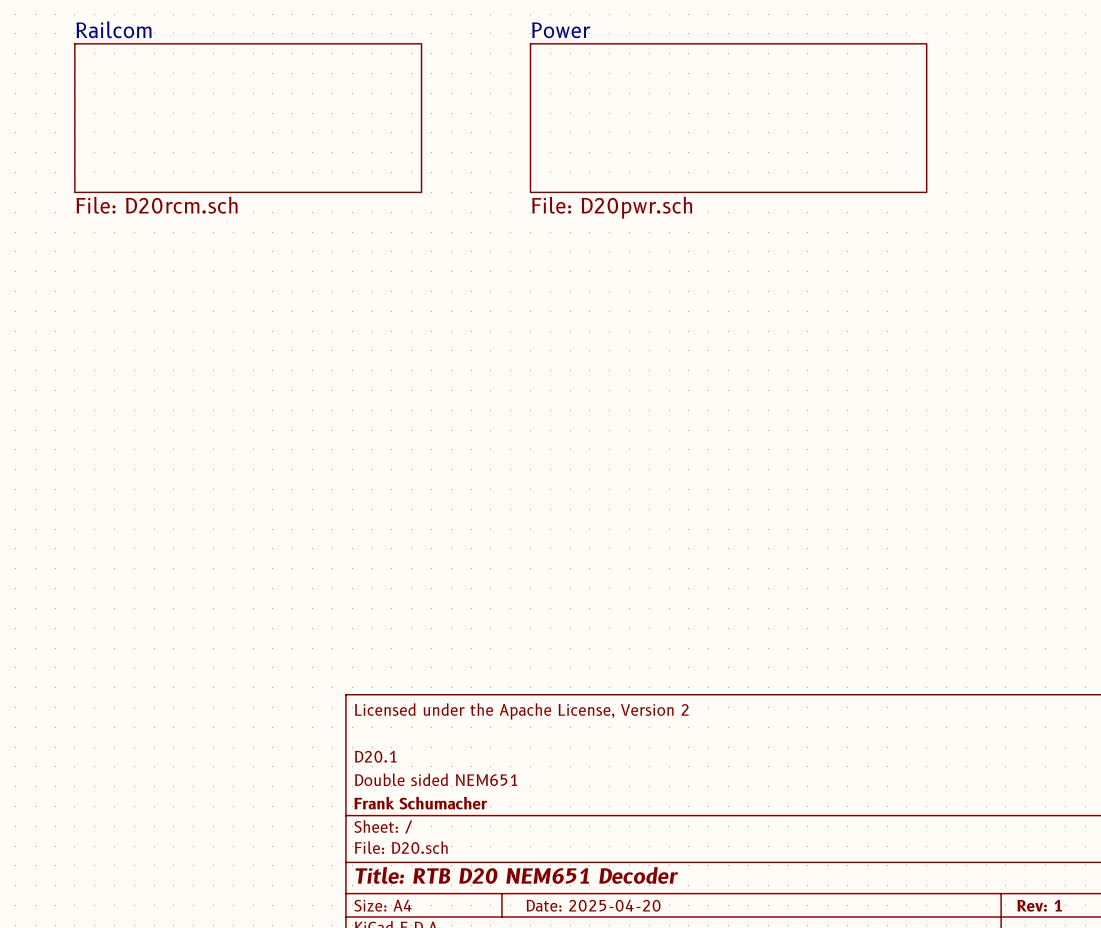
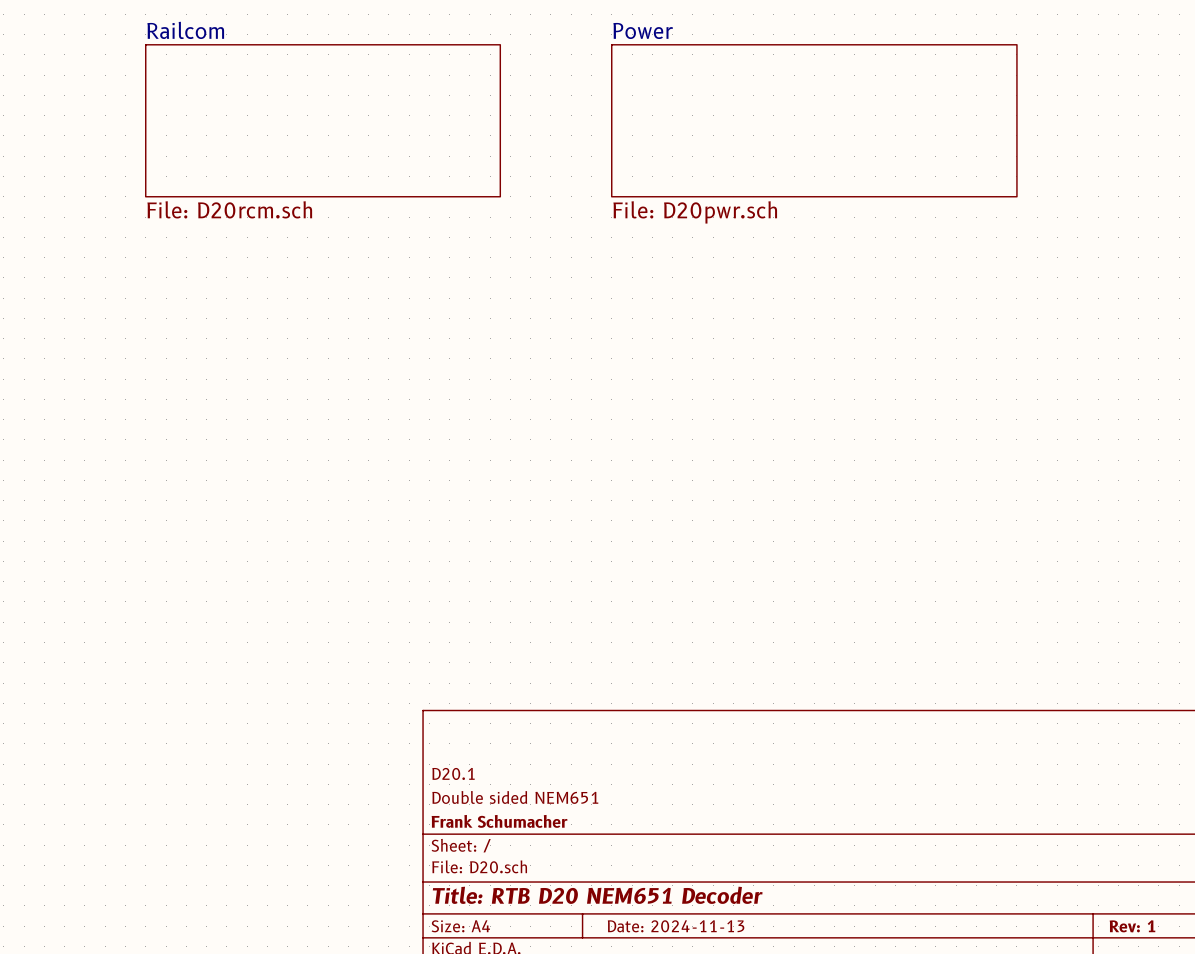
title block: Licensed under the Apache License, Version 2 (521, 711) -> none
title block: Date: 2025-04-20 (593, 905) -> Date: 2024-11-13 (676, 926)

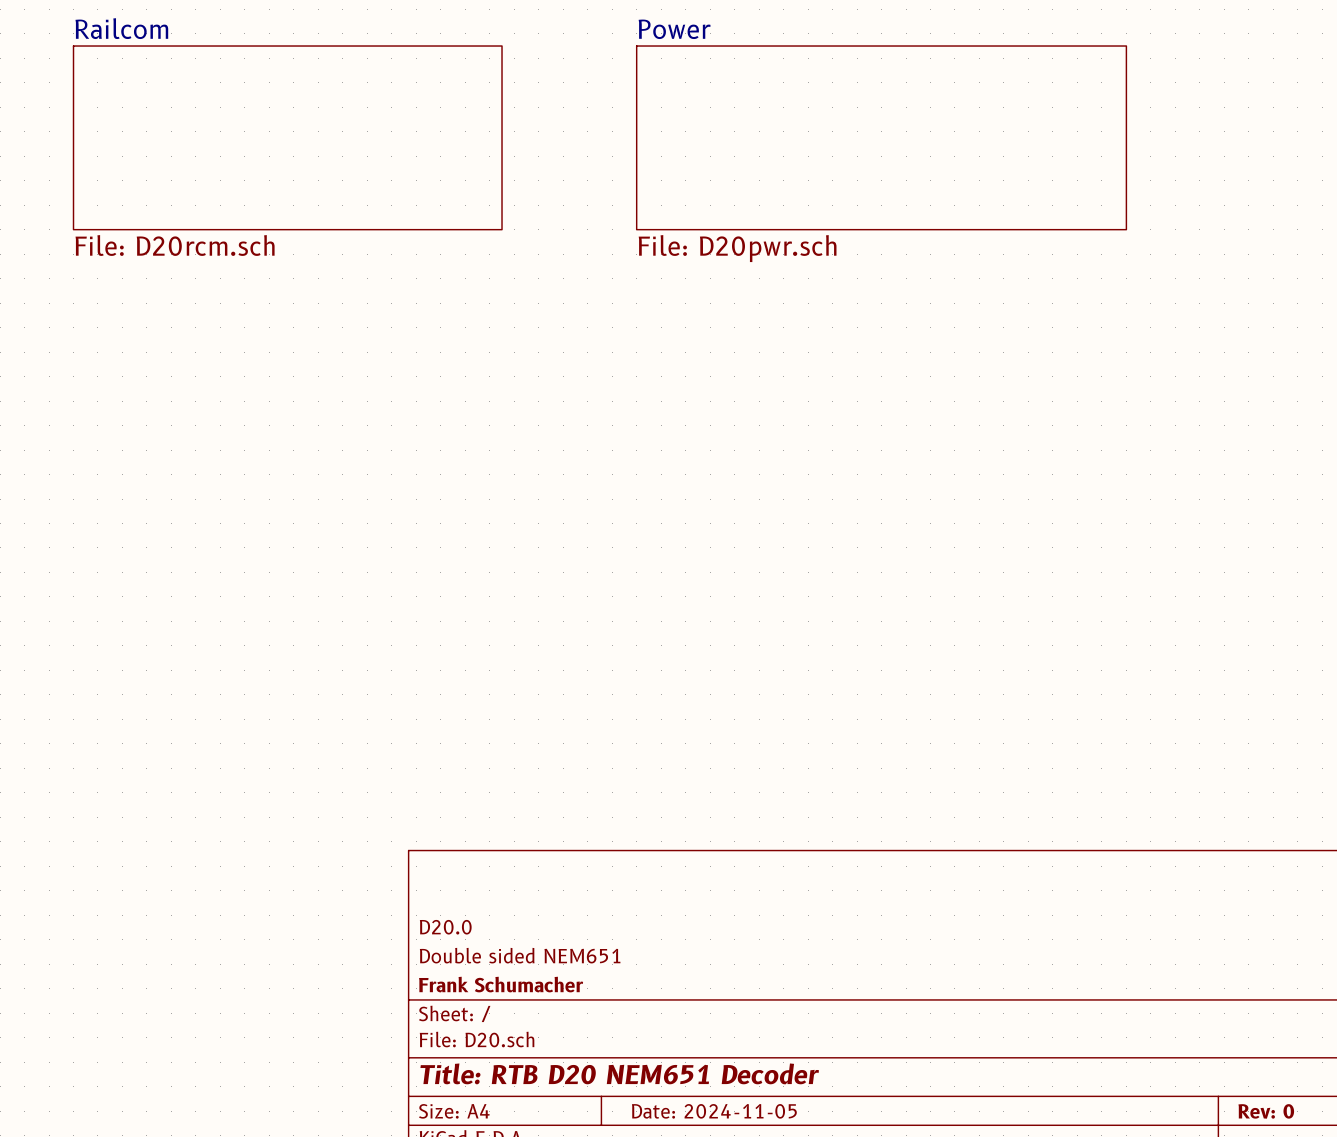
title block: D20.1 (453, 773) -> D20.0 (445, 927)
title block: Date: 2024-11-13 (676, 926) -> Date: 2024-11-05 (714, 1111)
title block: Rev: 1 (1132, 926) -> Rev: 0 (1266, 1111)

